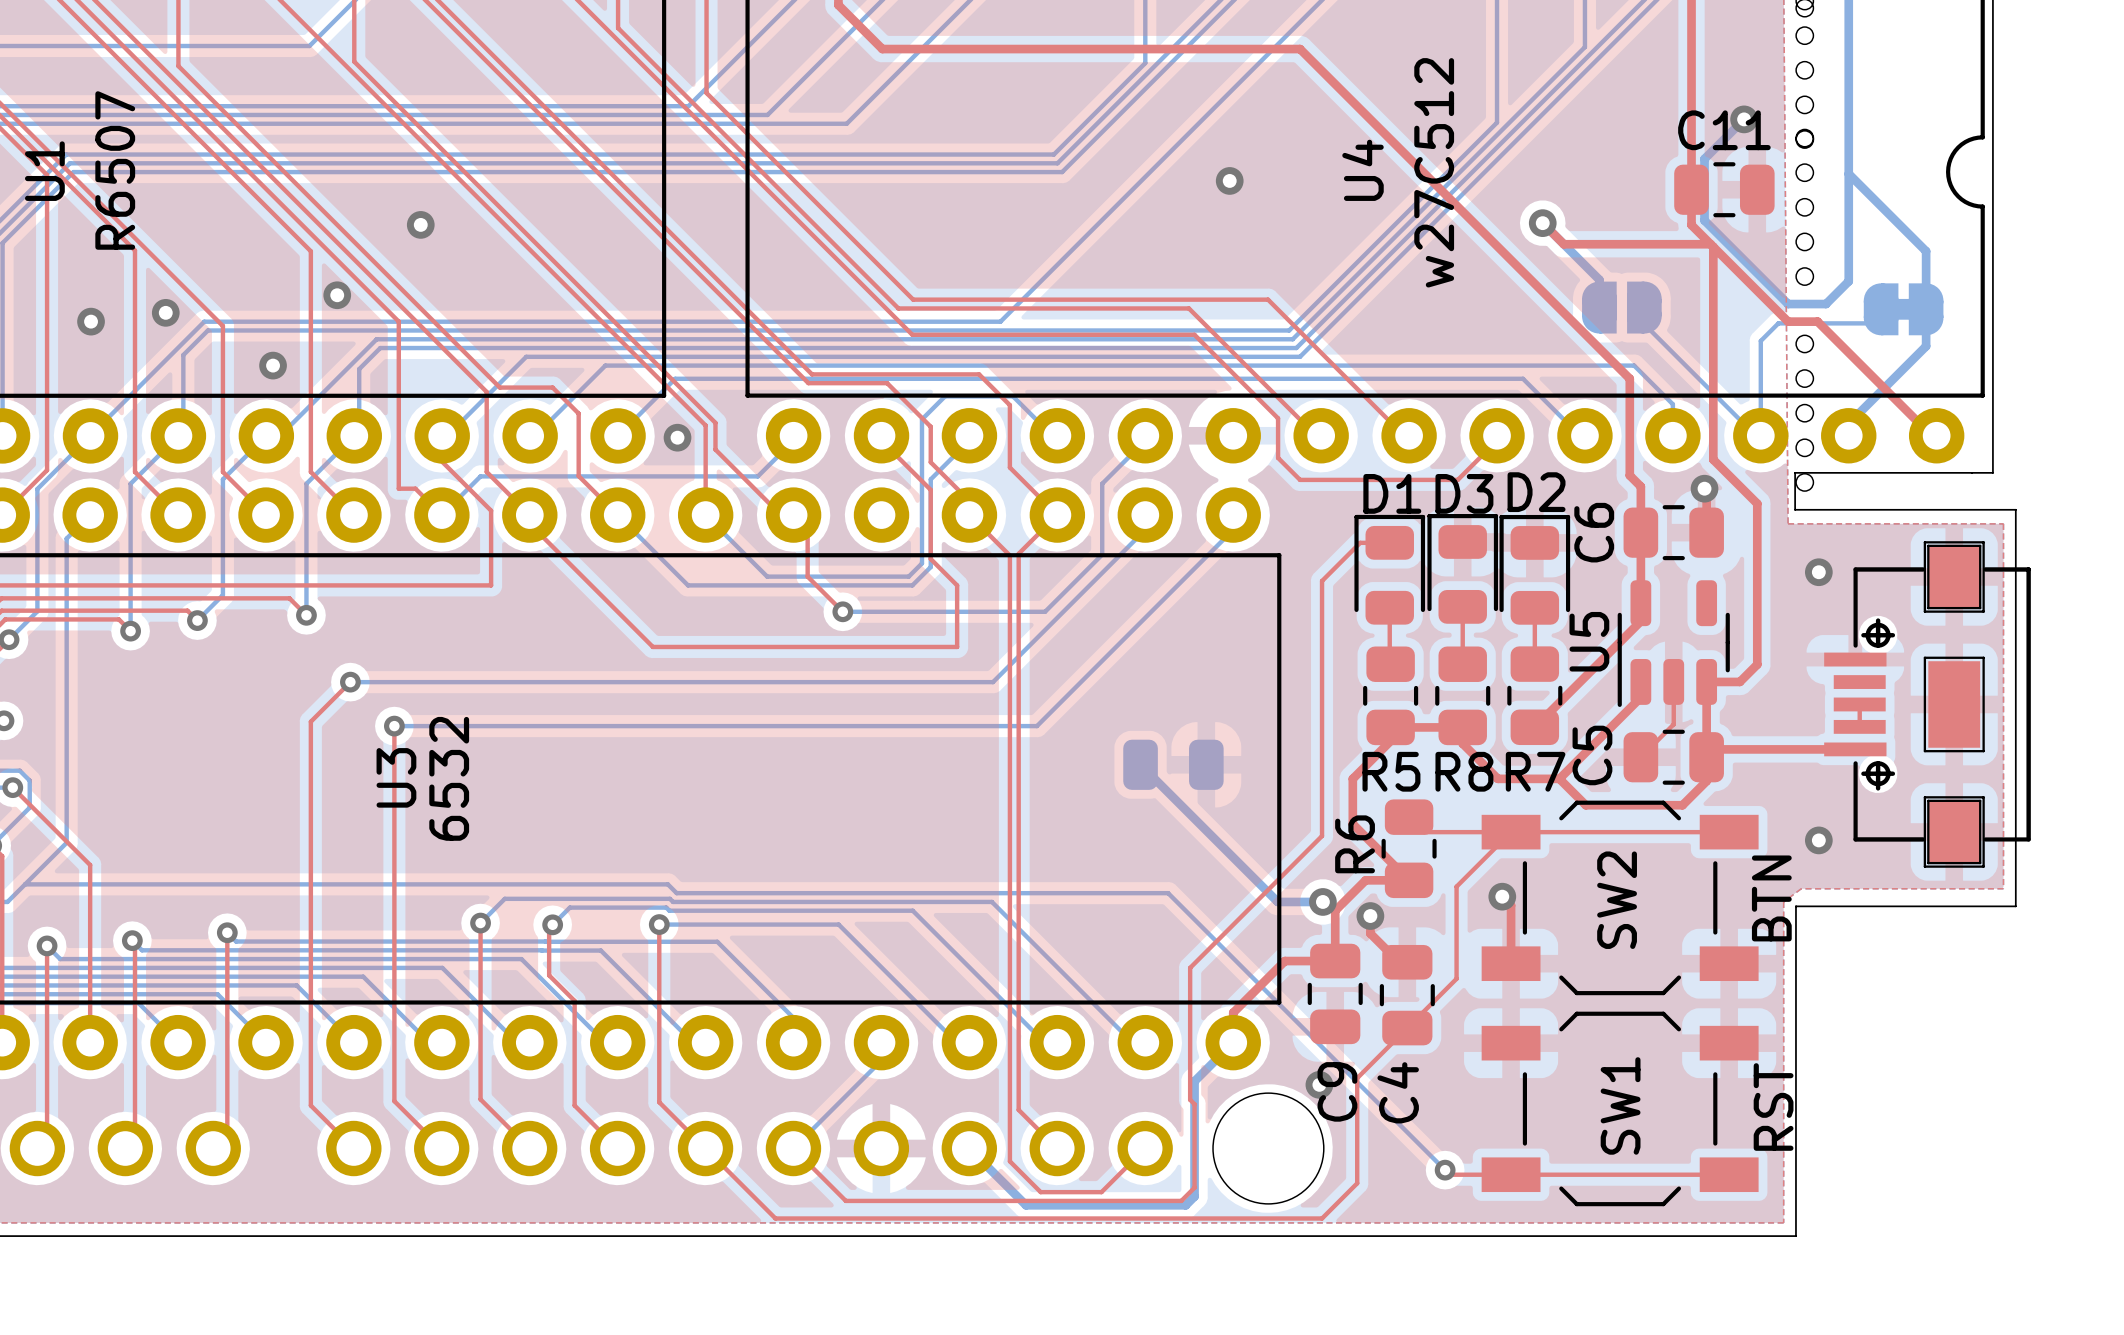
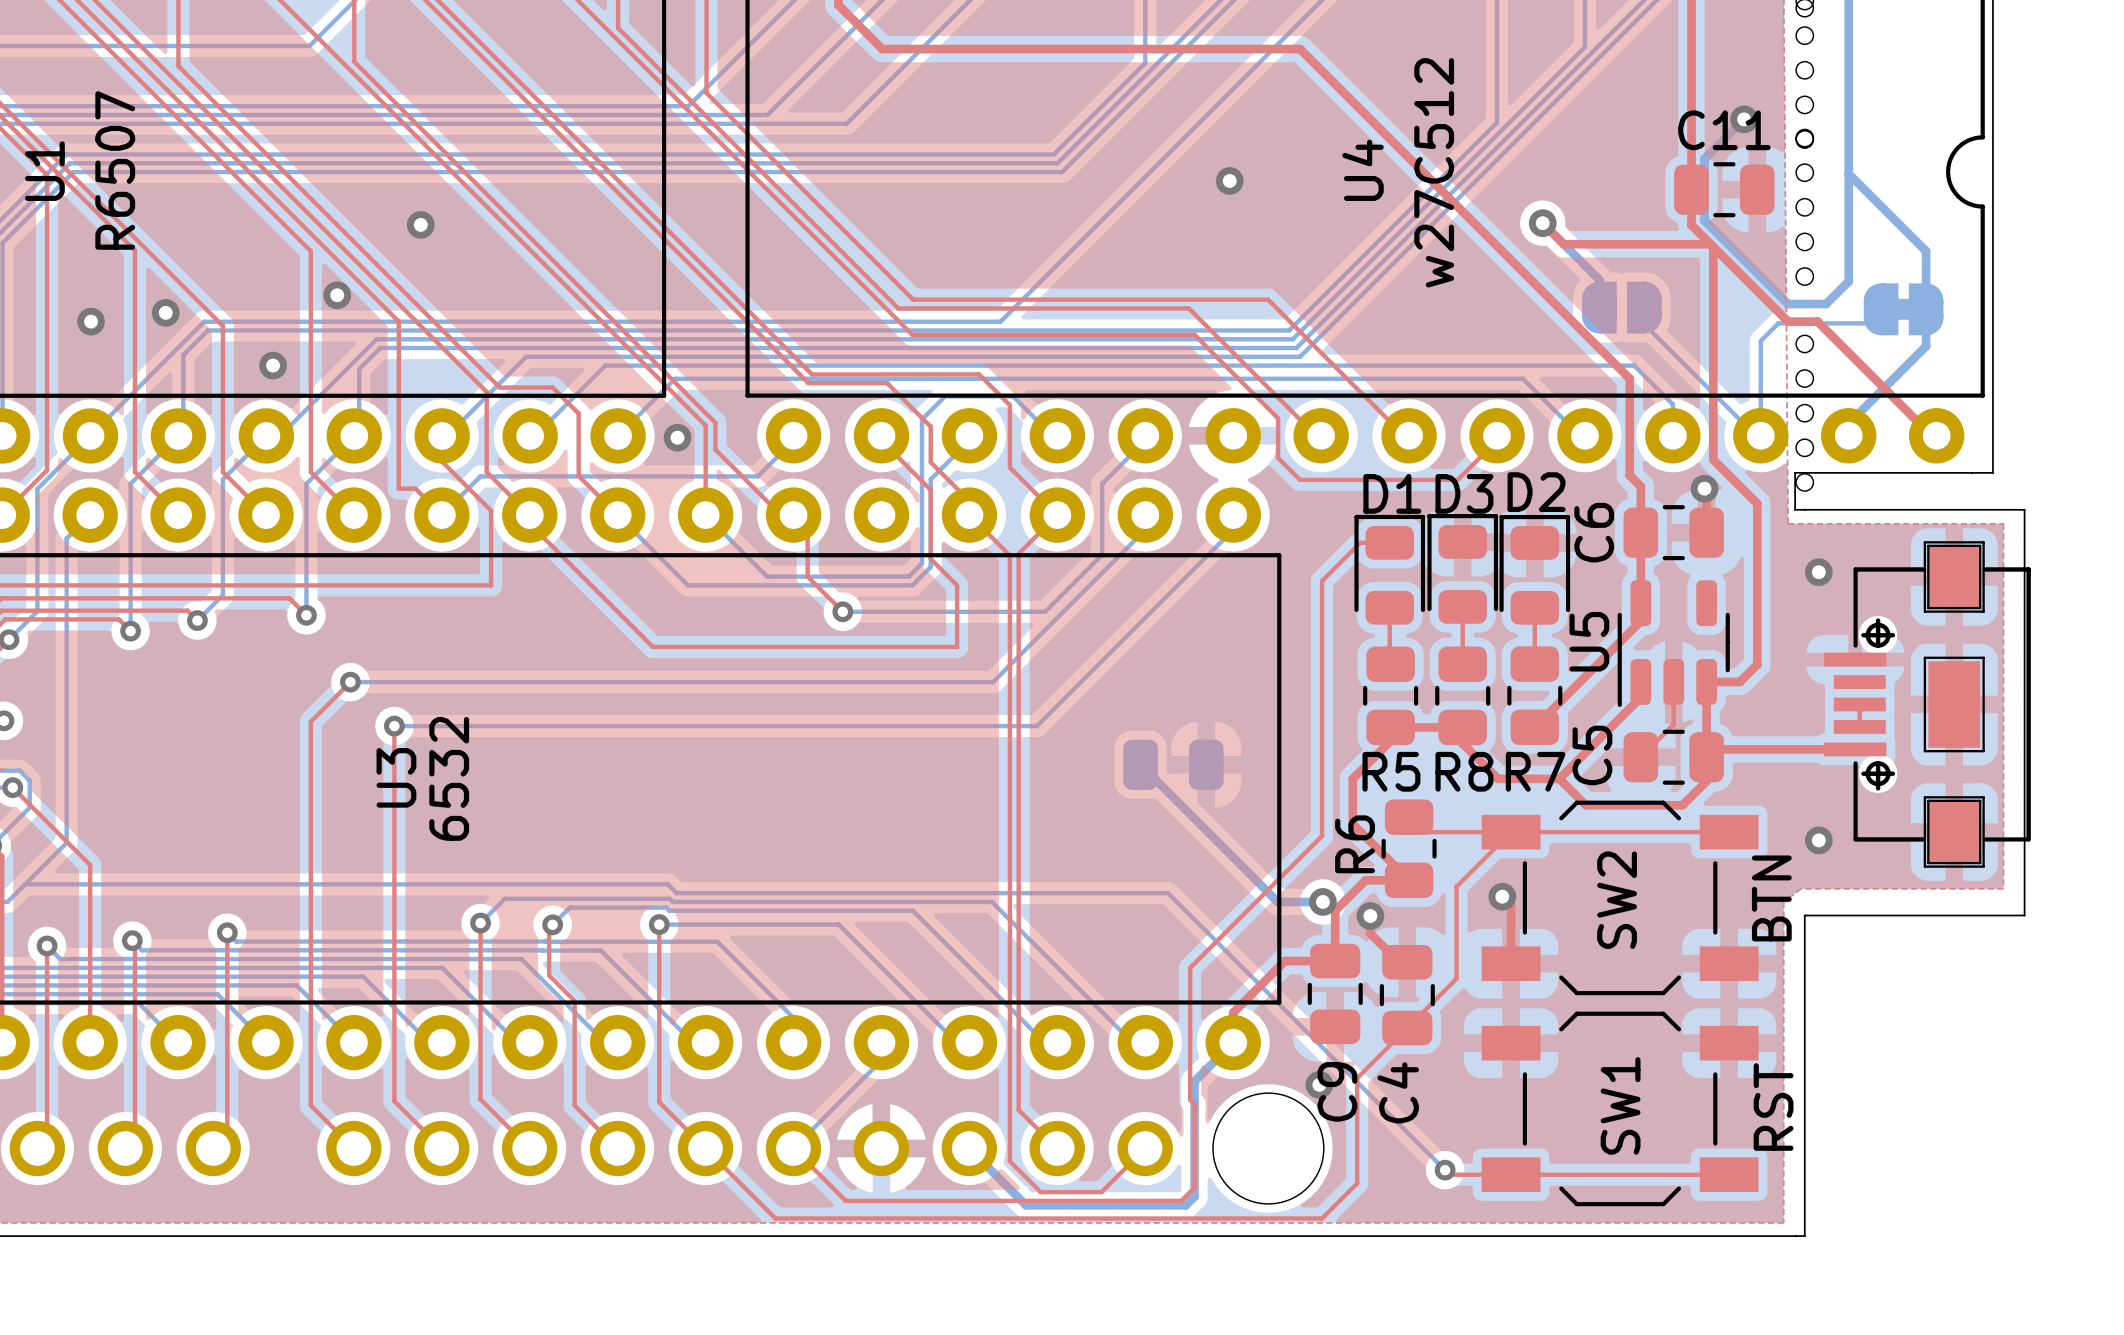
board edge: (2015, 509) (2015, 906) (1795, 906) (1795, 1236) -> (2015, 509) (2024, 509) (2024, 915) (1804, 915) (1804, 1236) (1795, 1236)

